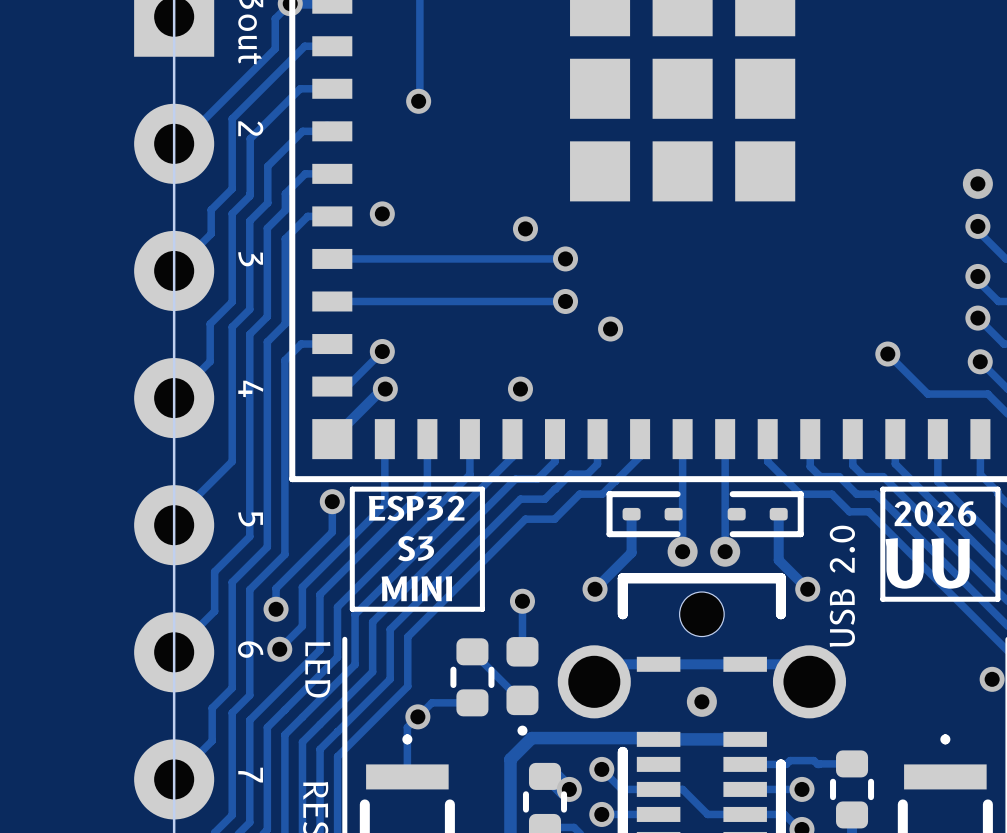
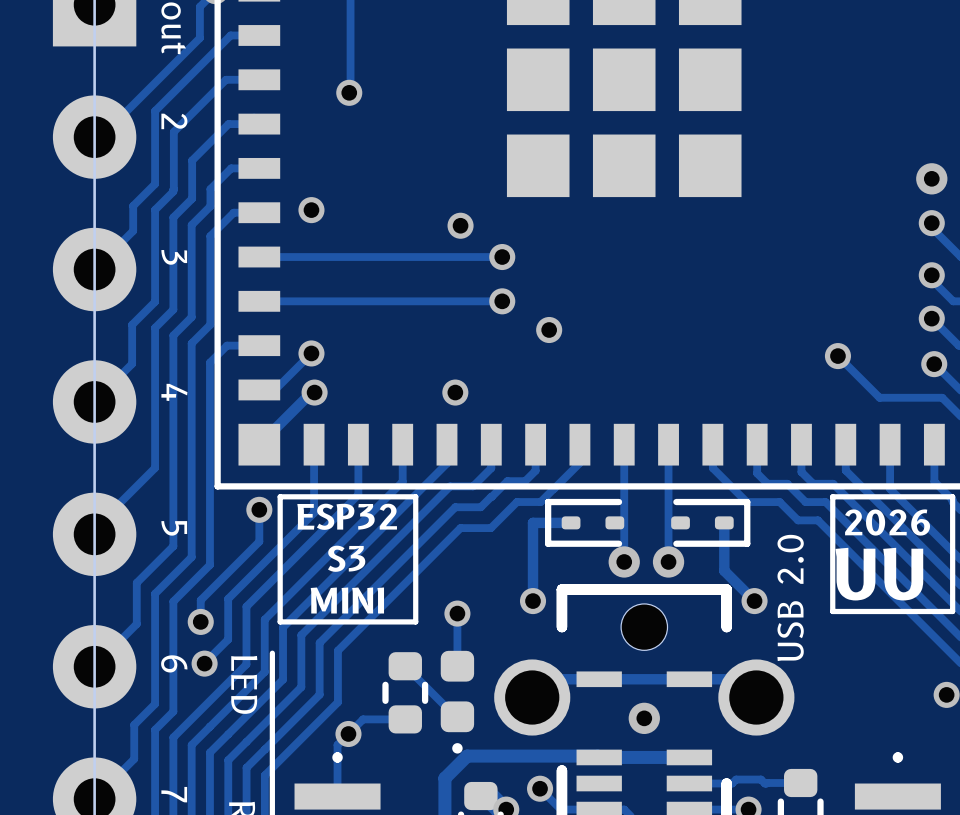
track: (631, 514) (631, 552) (595, 589) -> (571, 522) (533, 522) (533, 601)

